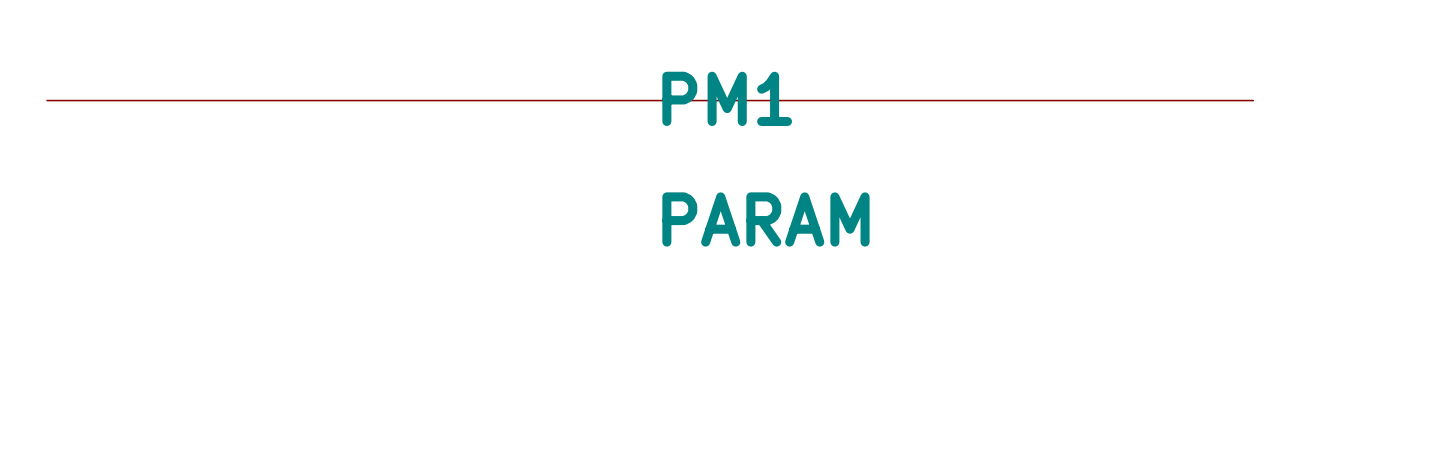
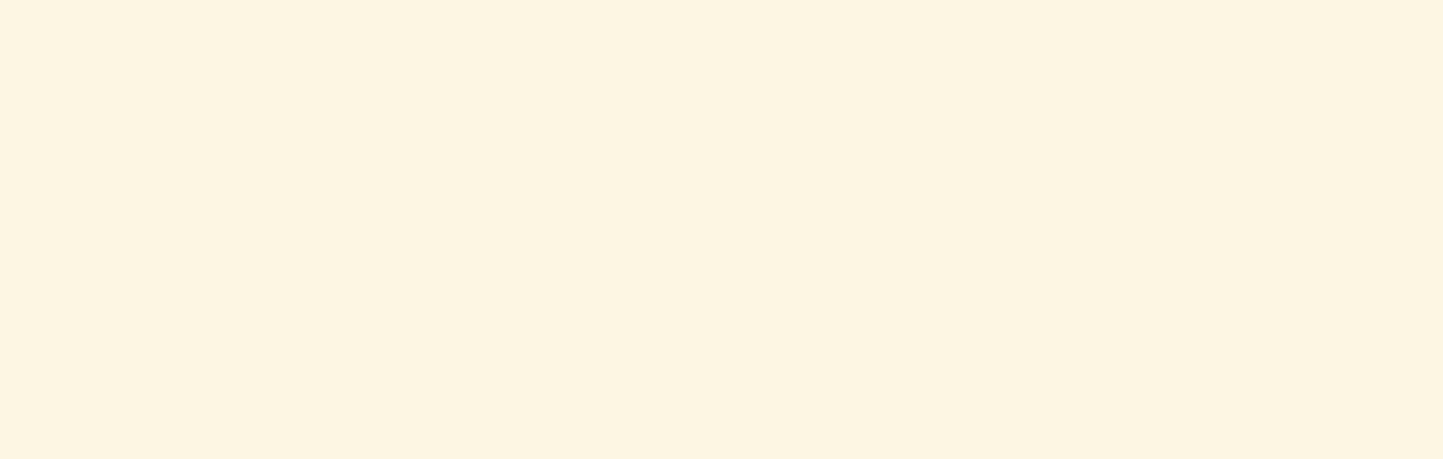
PM1: PARAM (650, 100) -> none

